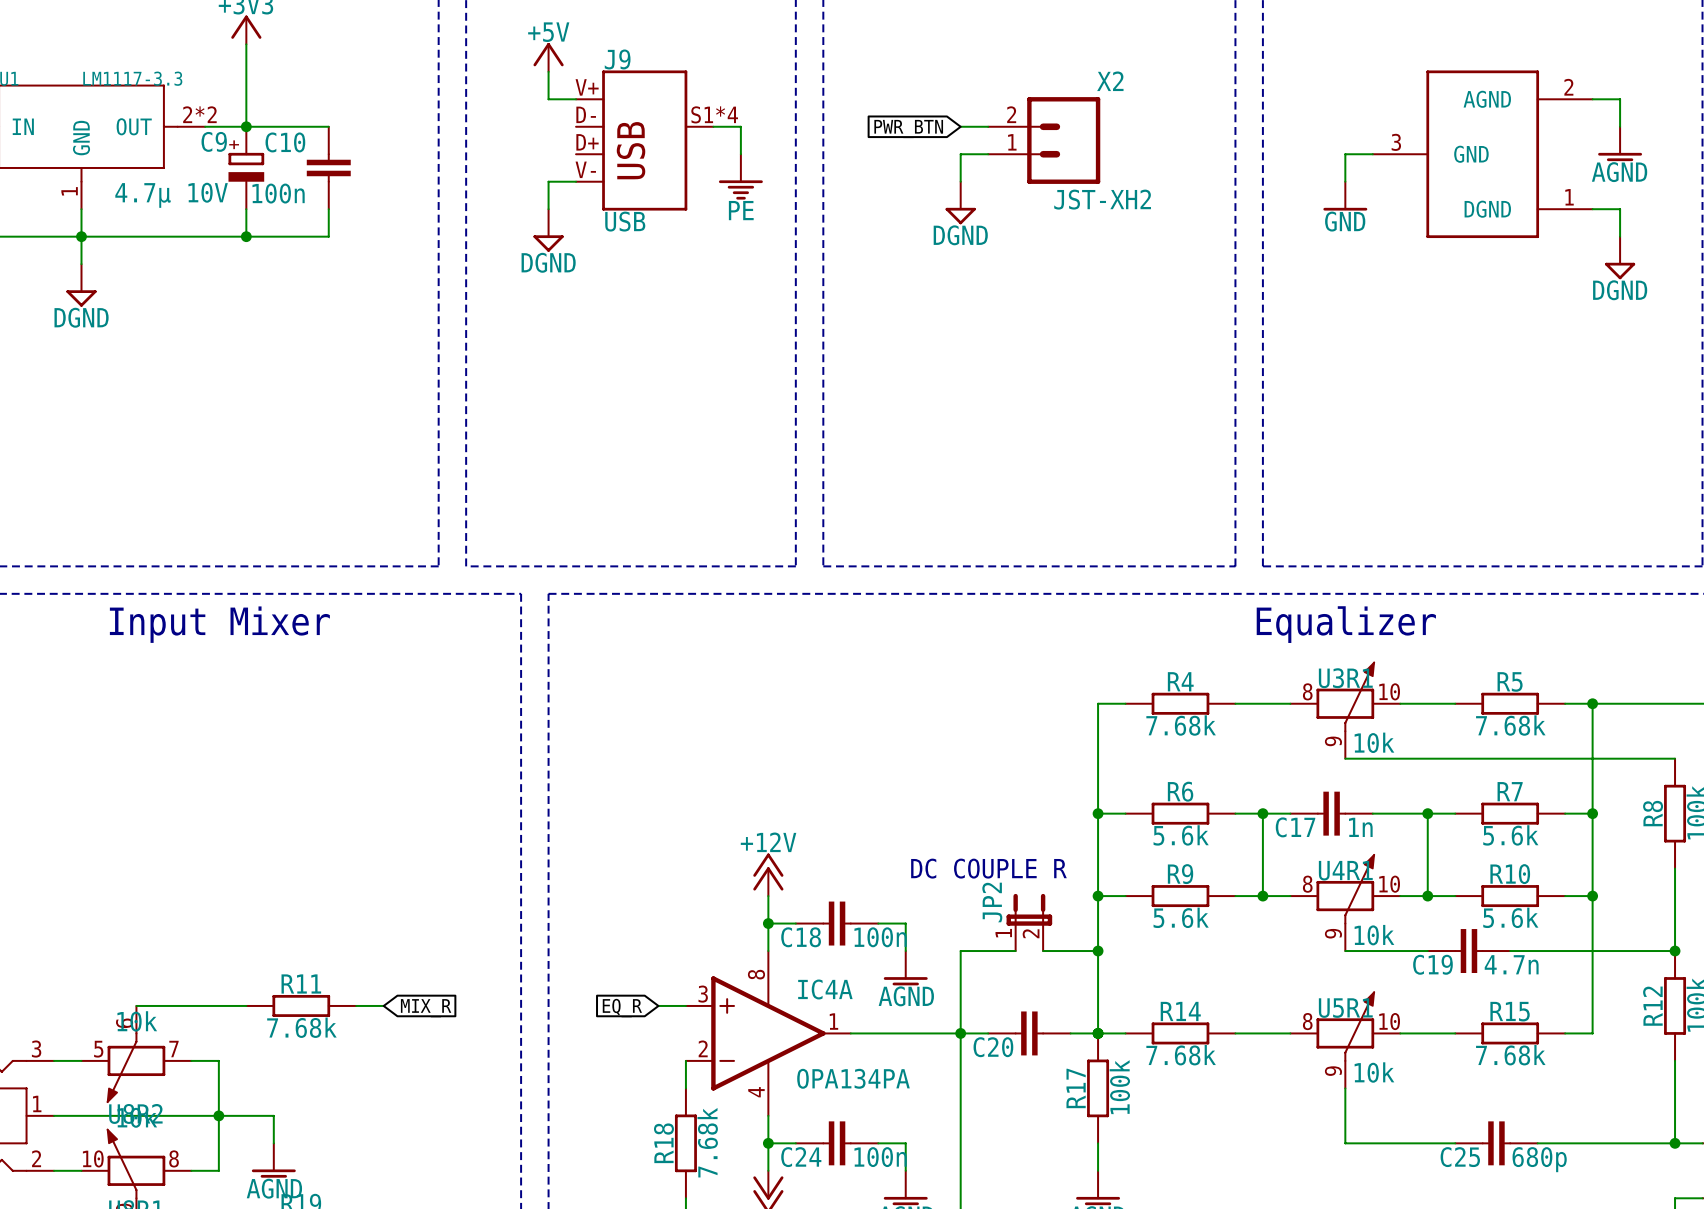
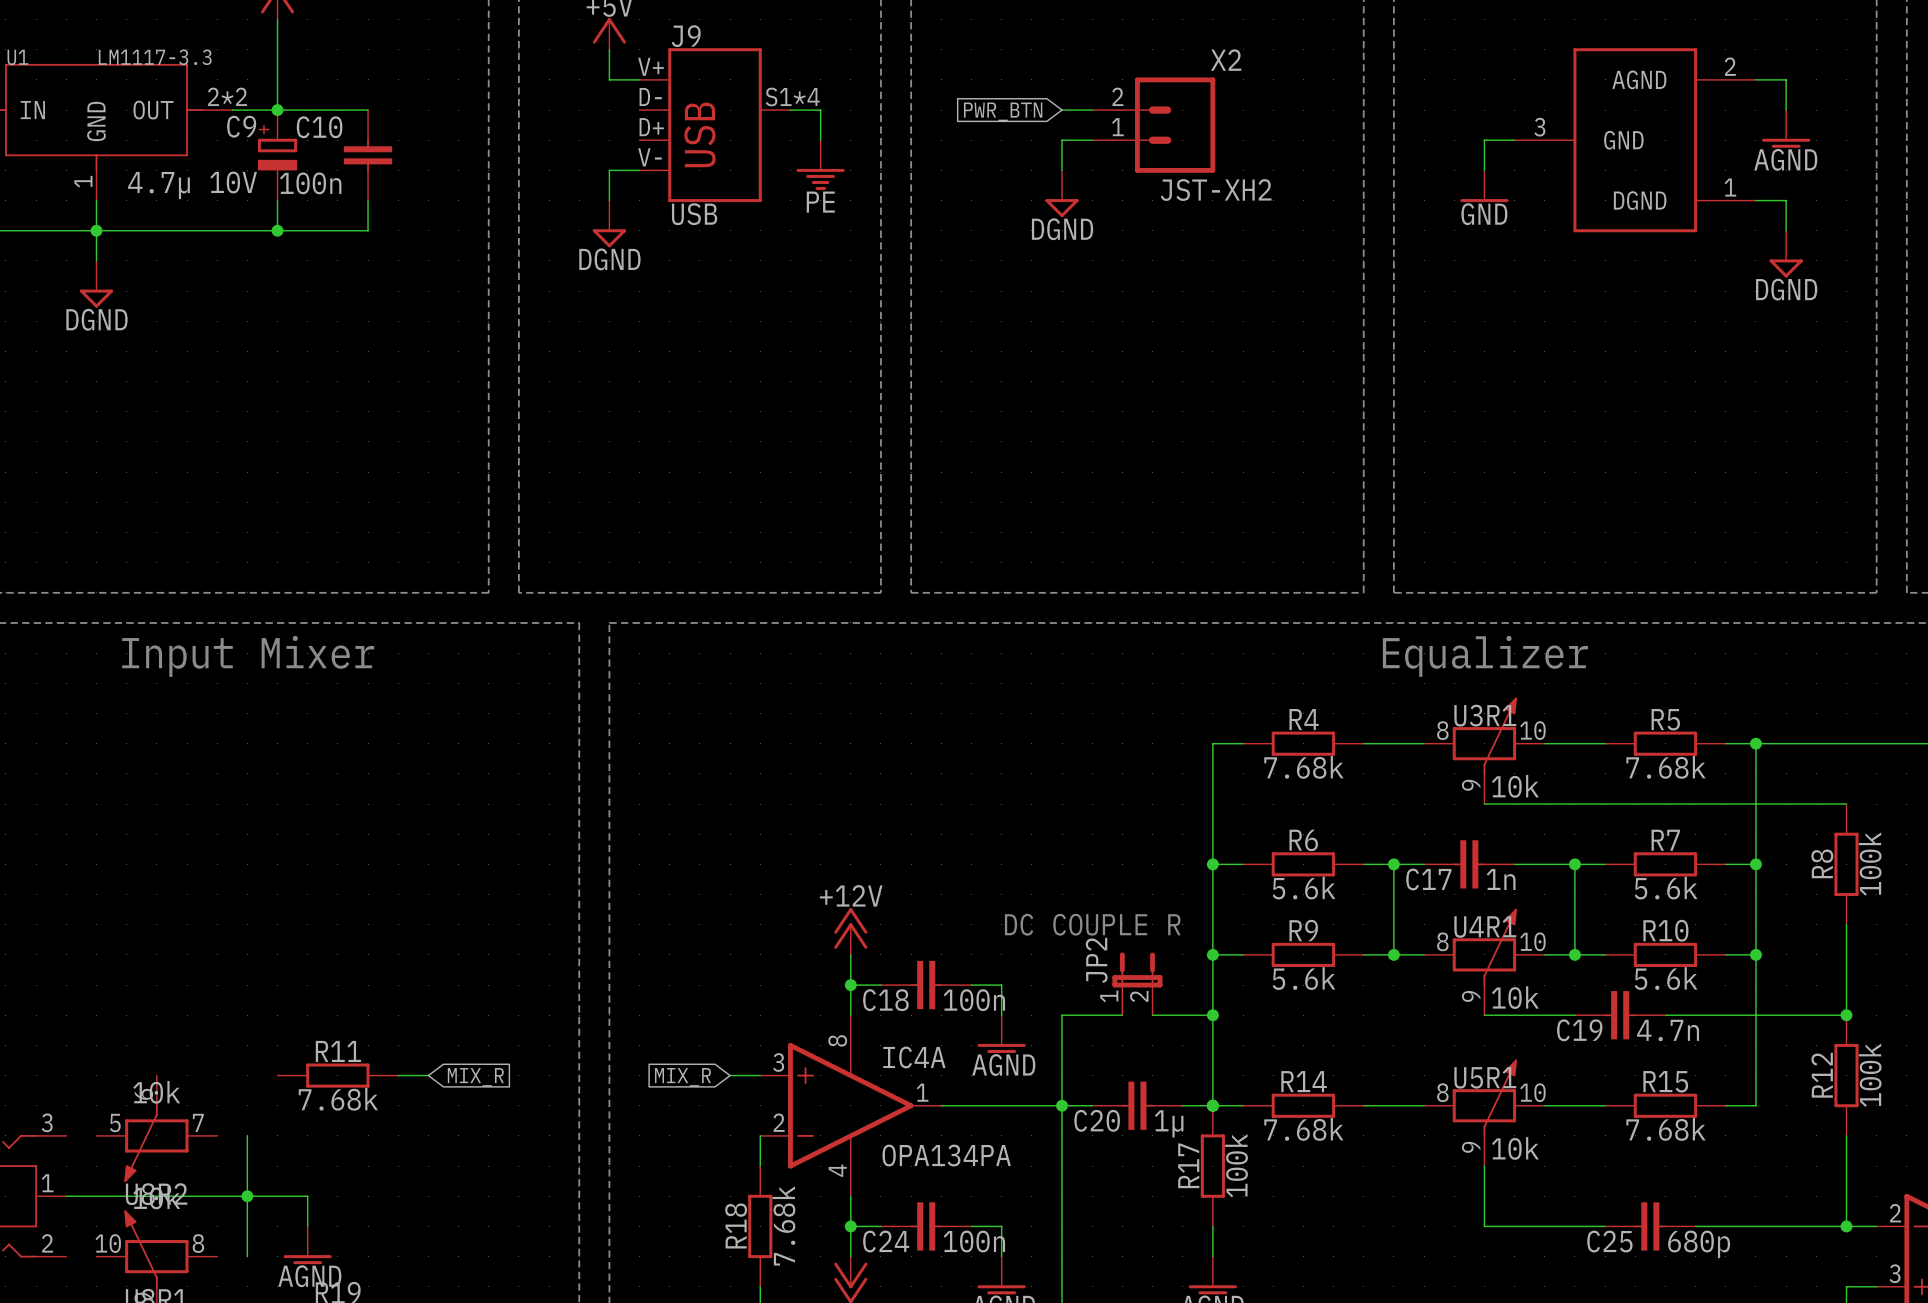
wire: (136, 1005) (246, 1005) -> none
global label: EQ_R (622, 1008) -> MIX_R (682, 1077)
C20 value: none -> 1µ (1169, 1123)
wire: (54, 1060) (81, 1060) -> none
wire: (191, 1060) (218, 1060) -> none
wire: (54, 1170) (81, 1170) -> none
wire: (191, 1170) (218, 1170) -> none

